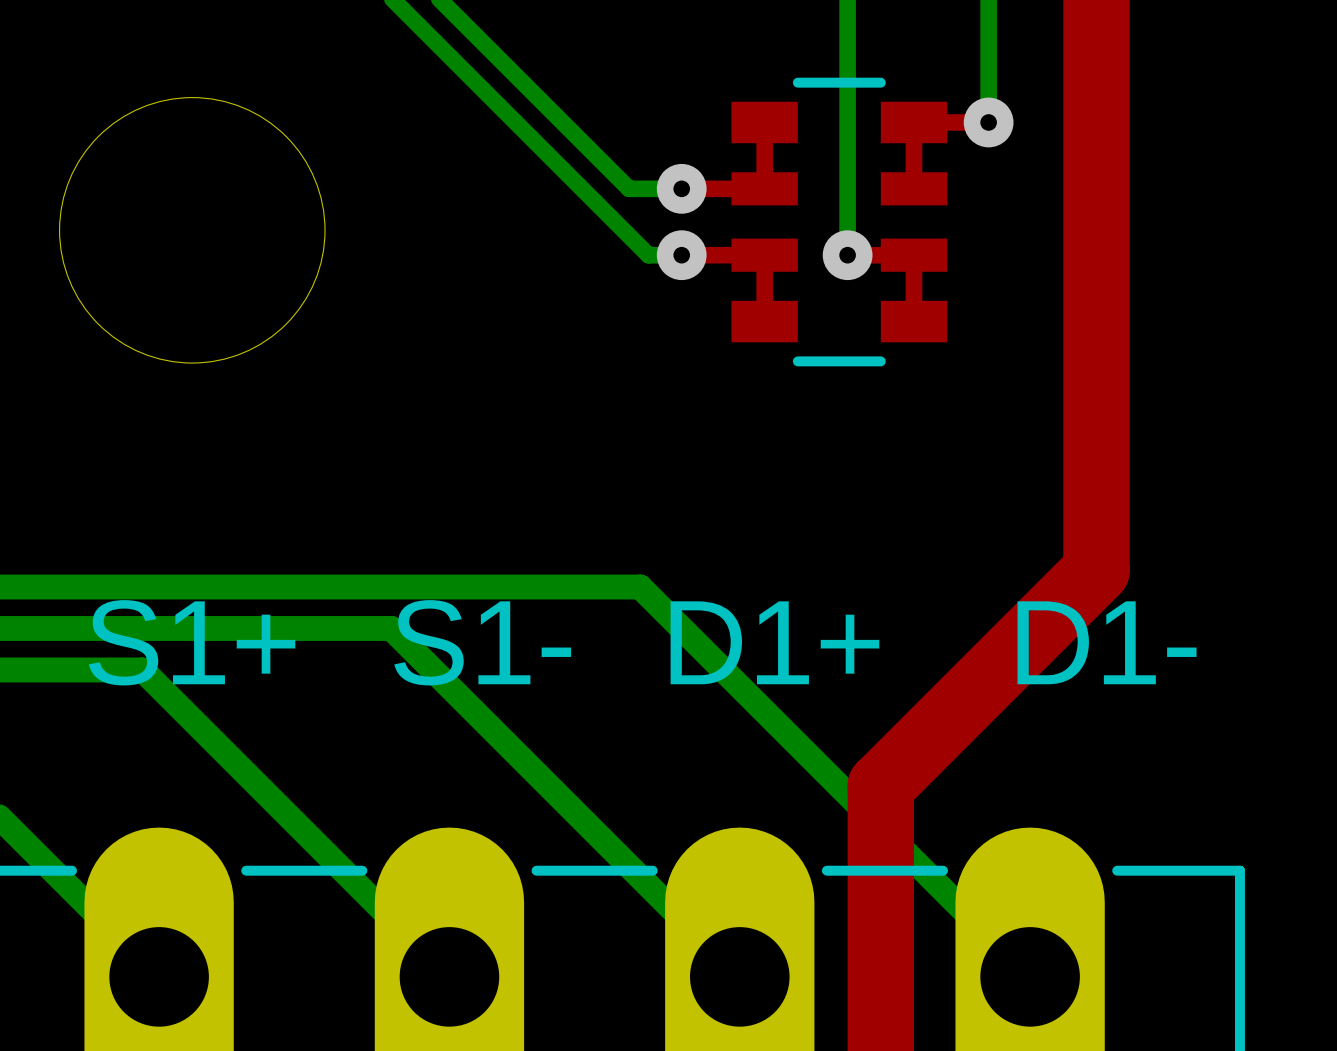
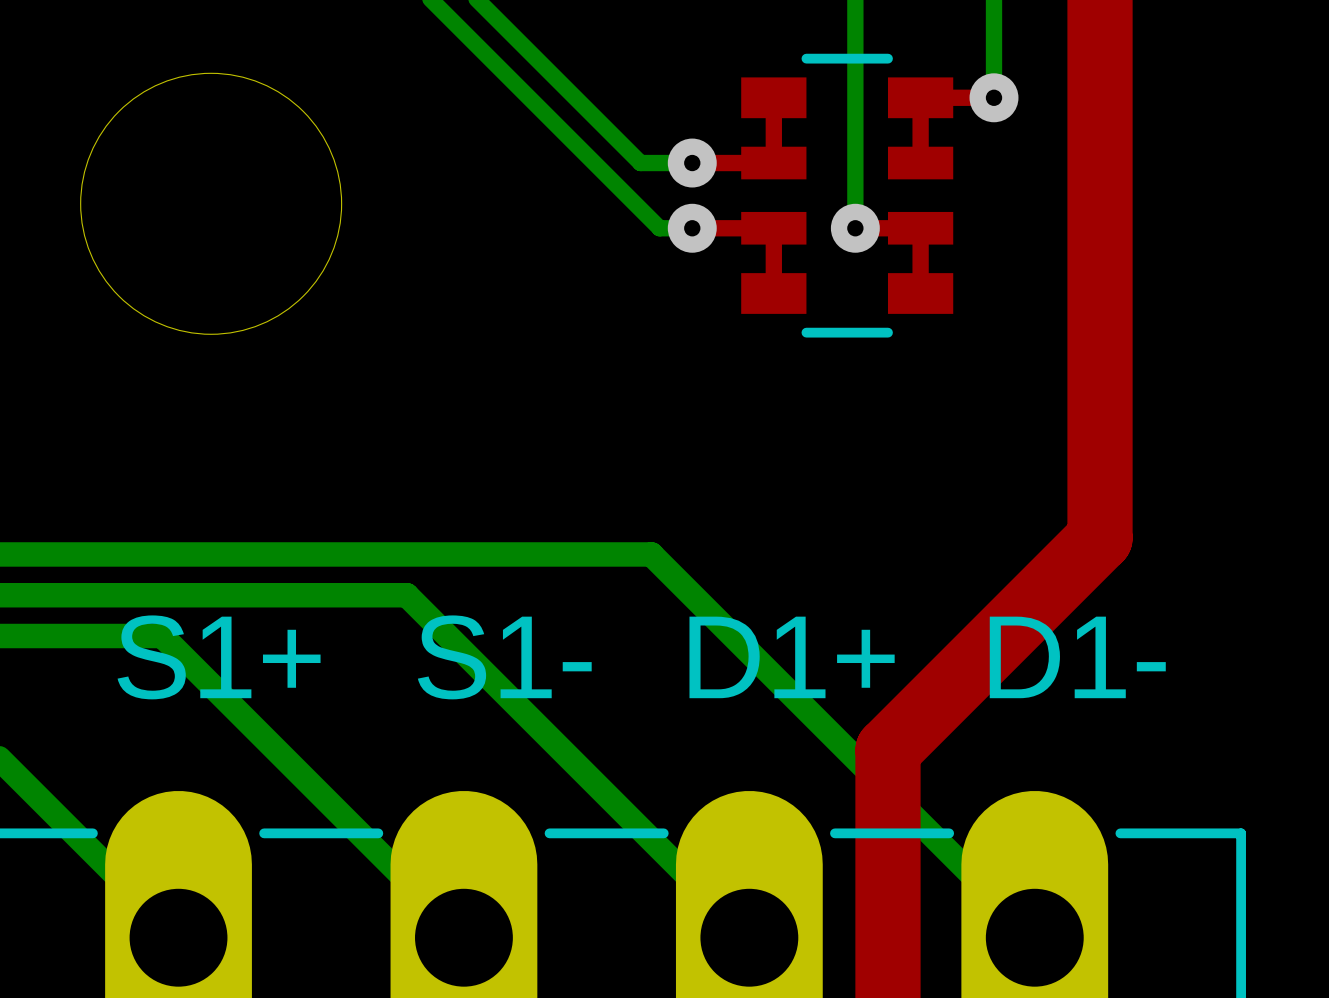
text position: S1+ (192, 642) -> S1+ (219, 657)
text position: S1- (482, 642) -> S1- (504, 657)
text position: D1+ (774, 642) -> D1+ (792, 657)
text position: D1- (1107, 642) -> D1- (1077, 657)

